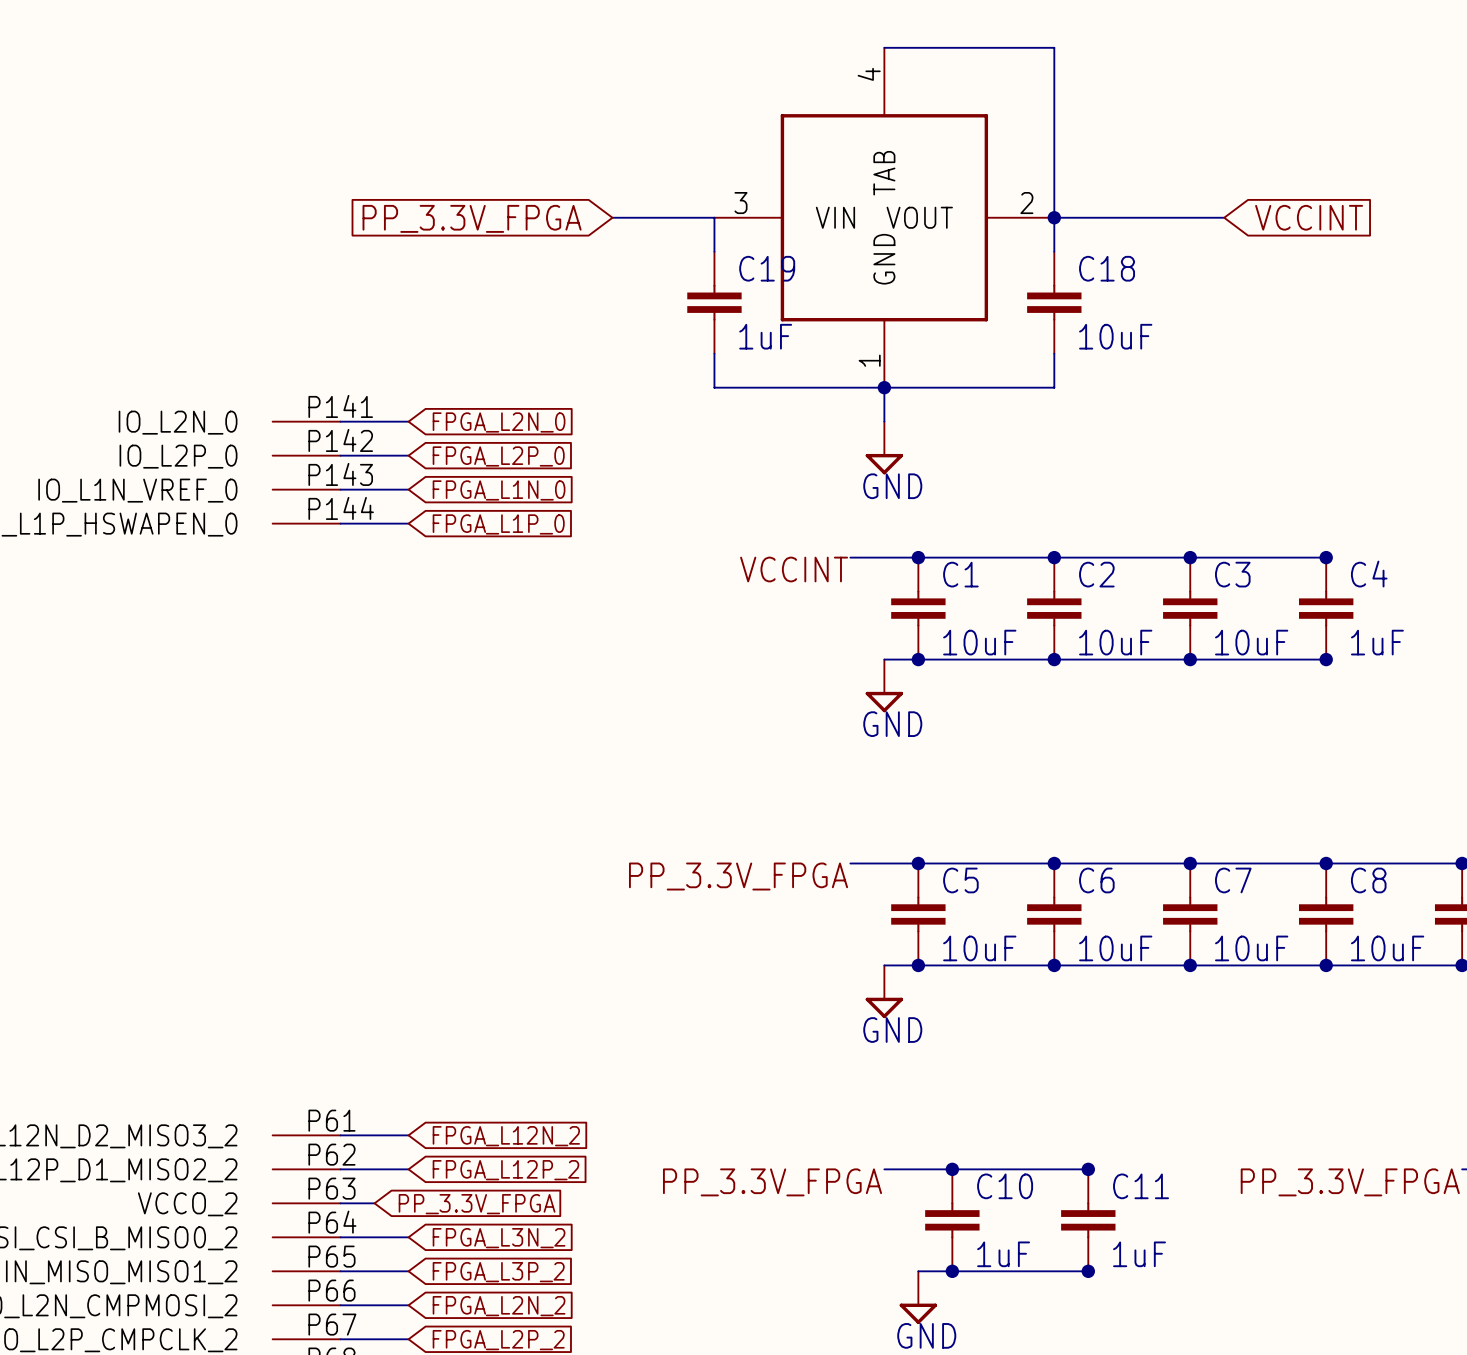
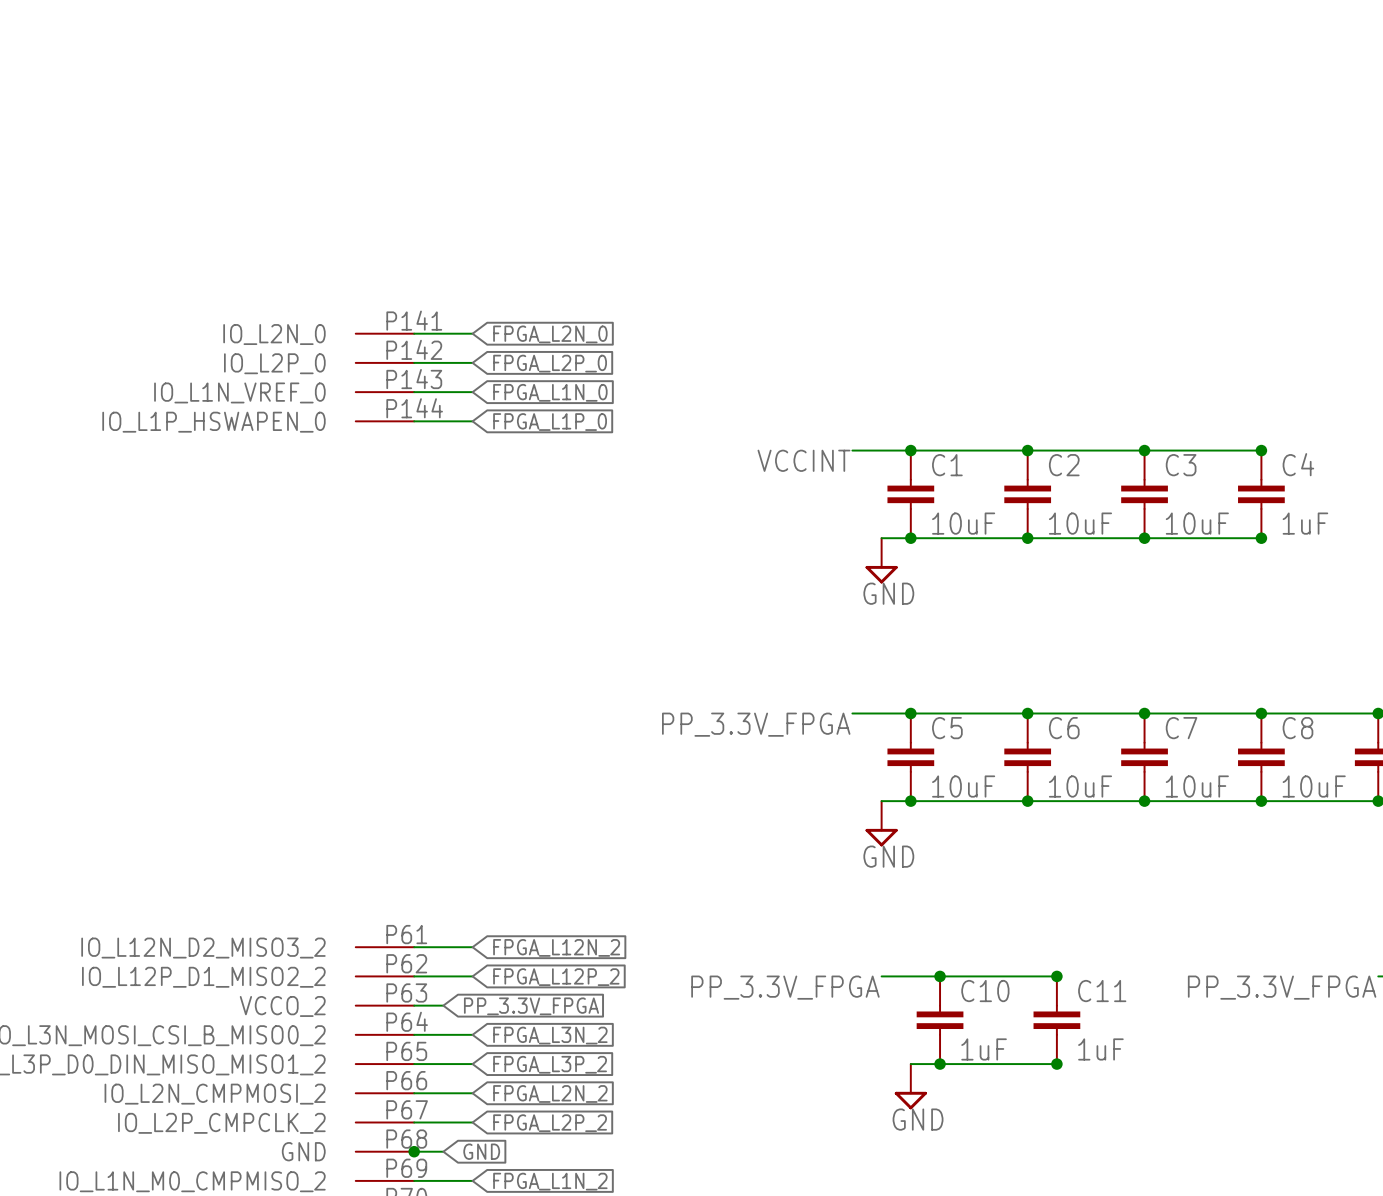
wire: (884, 47) (1054, 47) (1054, 251) -> none
wire: (612, 217) (714, 217) (714, 251) -> none
part: (884, 217) -> none
wire: (1054, 217) (1224, 217) -> none
junction: (1054, 217) -> none
global label: VCCINT (1309, 217) -> none
global label: PP_3.3V_FPGA (472, 218) -> none
C19: 1uF (714, 302) -> none
C18: 10uF (1054, 302) -> none
wire: (714, 353) (714, 387) (1054, 387) (1054, 353) -> none
wire: (884, 387) (884, 421) -> none
junction: (884, 387) -> none
power symbol: GND (884, 448) -> none

